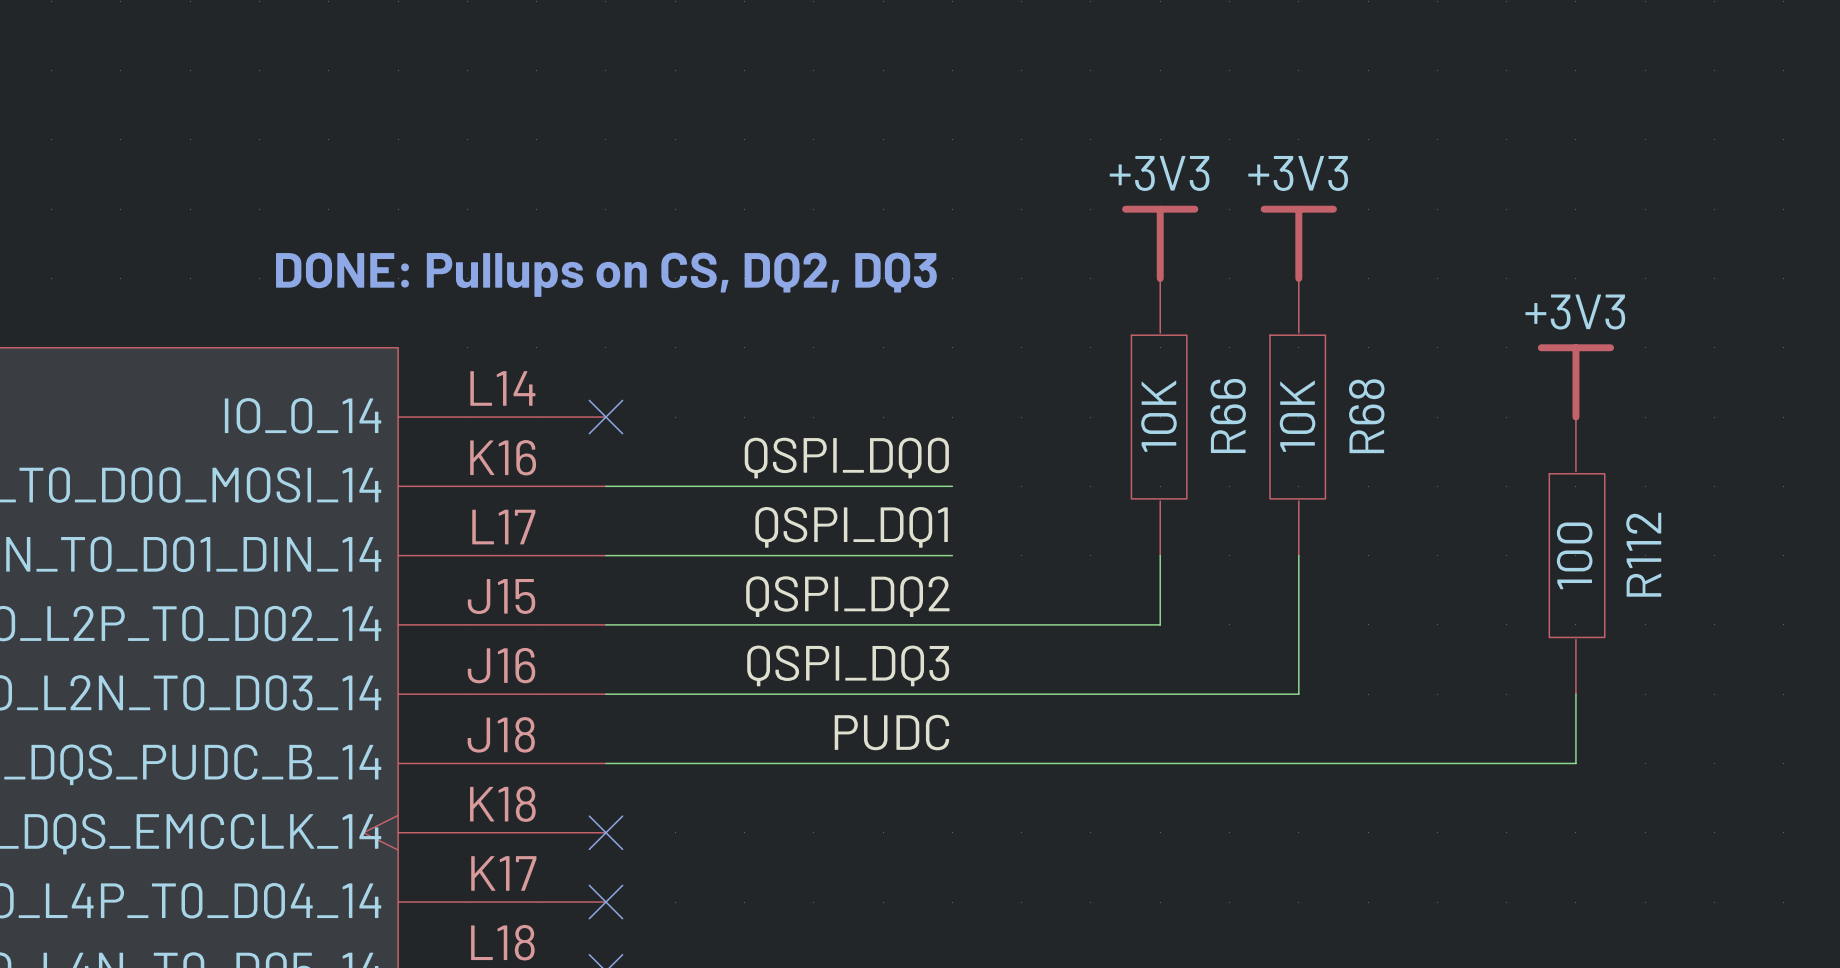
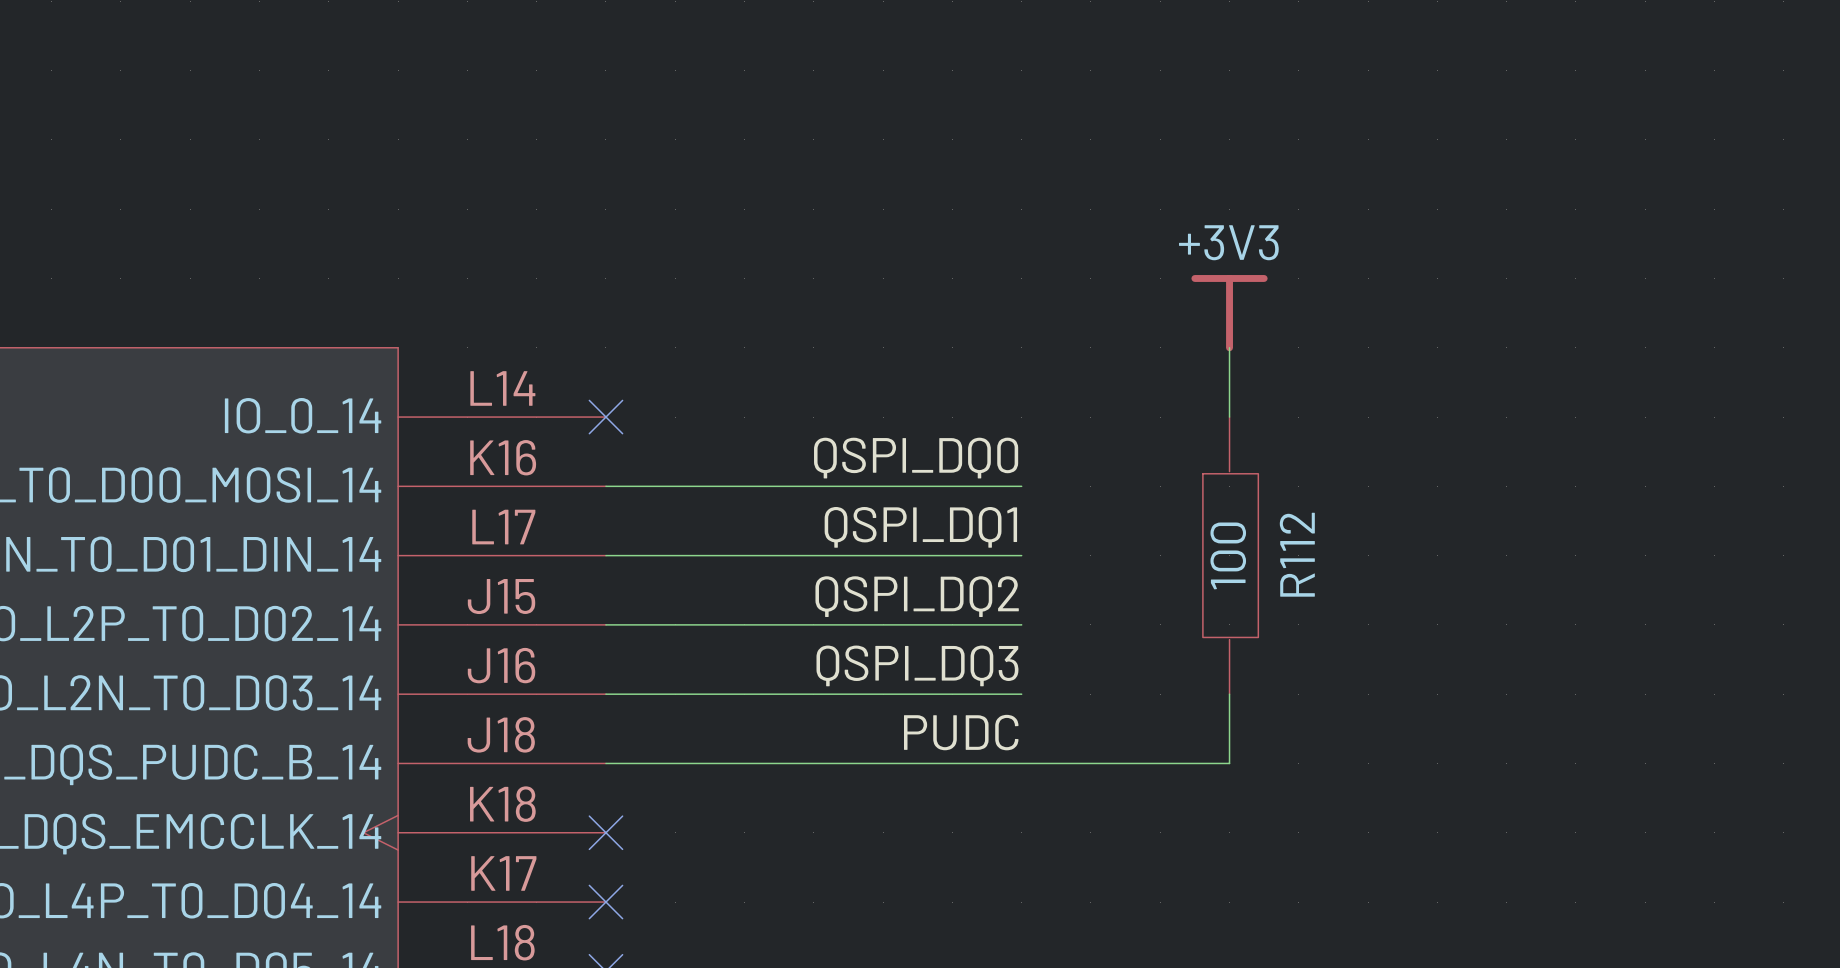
power symbol: +3V3 (1160, 243) -> none
power symbol: +3V3 (1298, 243) -> none
text: DONE: Pullups on CS, DQ2, DQ3 (606, 274) -> none
power symbol: none -> +3V3 (1229, 313)
wire: none -> (1229, 347) (1229, 417)
power symbol: +3V3 (1575, 382) -> none
R66: 10K (1159, 417) -> none
R68: 10K (1297, 417) -> none
label position: QSPI_DQ0 (846, 458) -> QSPI_DQ0 (916, 458)
wire: none -> (952, 486) (1021, 486)
label position: QSPI_DQ1 (851, 527) -> QSPI_DQ1 (920, 527)
wire: none -> (952, 555) (1021, 555)
wire: (1160, 555) (1160, 624) (1021, 624) -> none
wire: (1298, 555) (1298, 694) (1021, 694) -> none
R112 position: (1577, 555) -> (1230, 555)
label position: QSPI_DQ2 (847, 596) -> QSPI_DQ2 (917, 596)
label position: QSPI_DQ3 (848, 665) -> QSPI_DQ3 (917, 665)
wire: (1575, 694) (1575, 763) (1229, 763) -> (1229, 694) (1229, 763)
label position: PUDC (891, 732) -> PUDC (961, 732)

